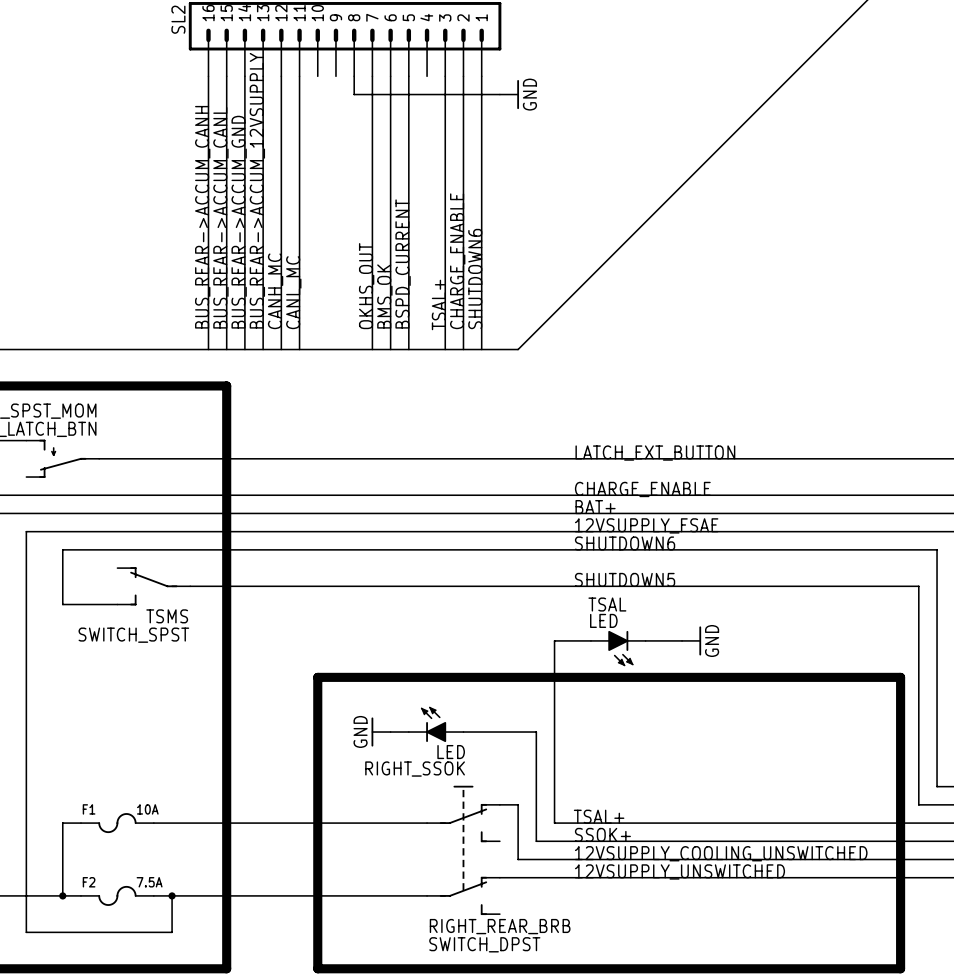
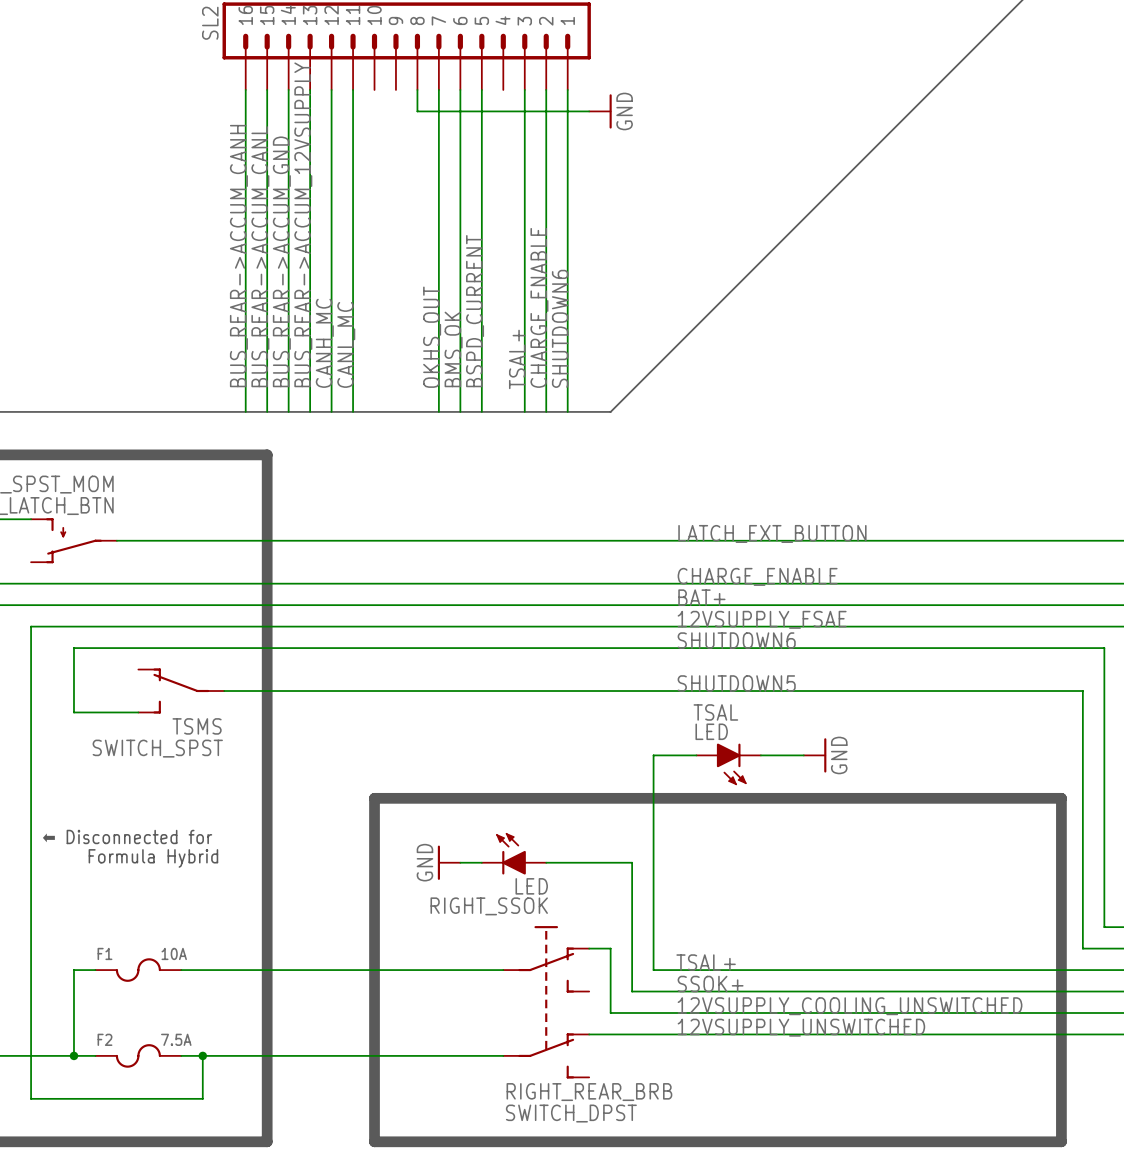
text: none -> ⬅ Disconnected for (127, 836)
text: none -> Formula Hybrid (153, 858)

